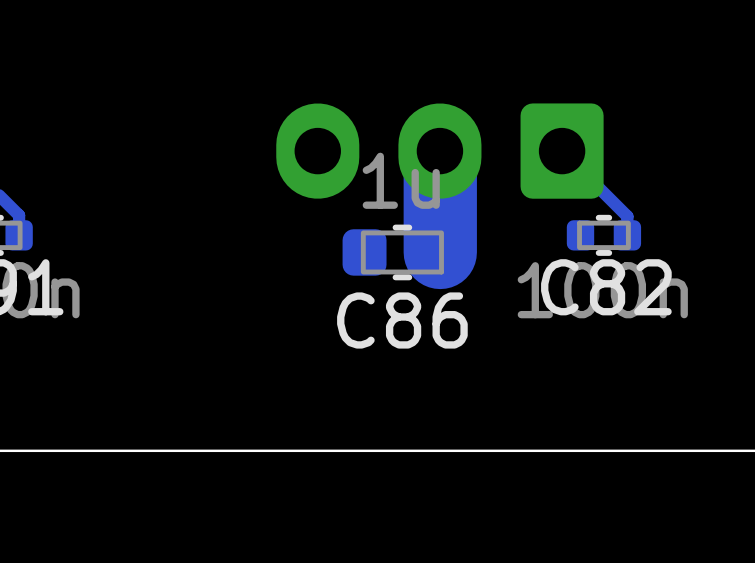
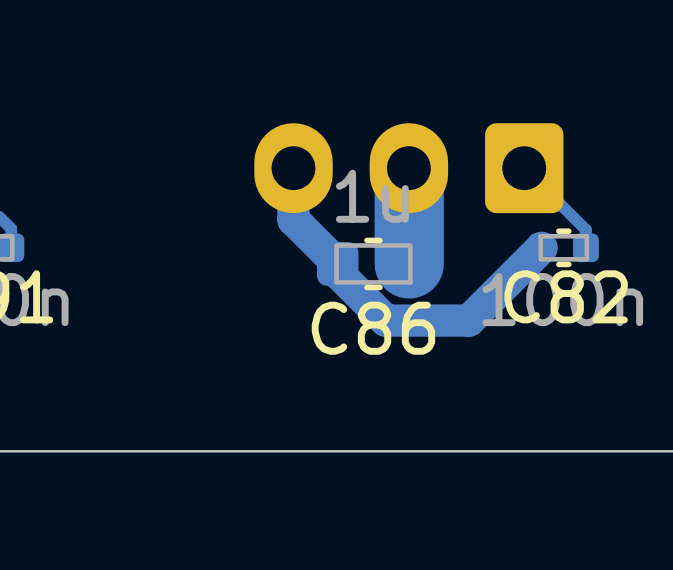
track: none -> (293, 168) (293, 219) (337, 263) (337, 272) (385, 320) (468, 320) (541, 247)

